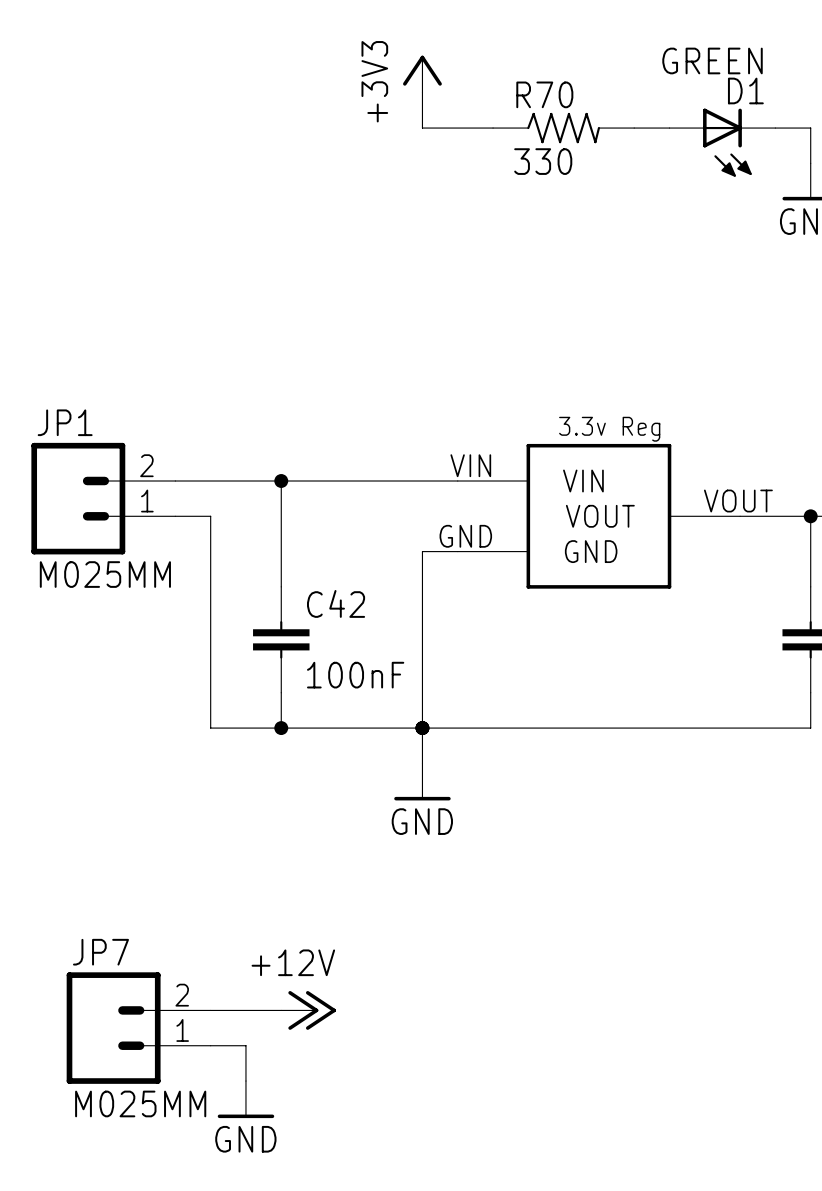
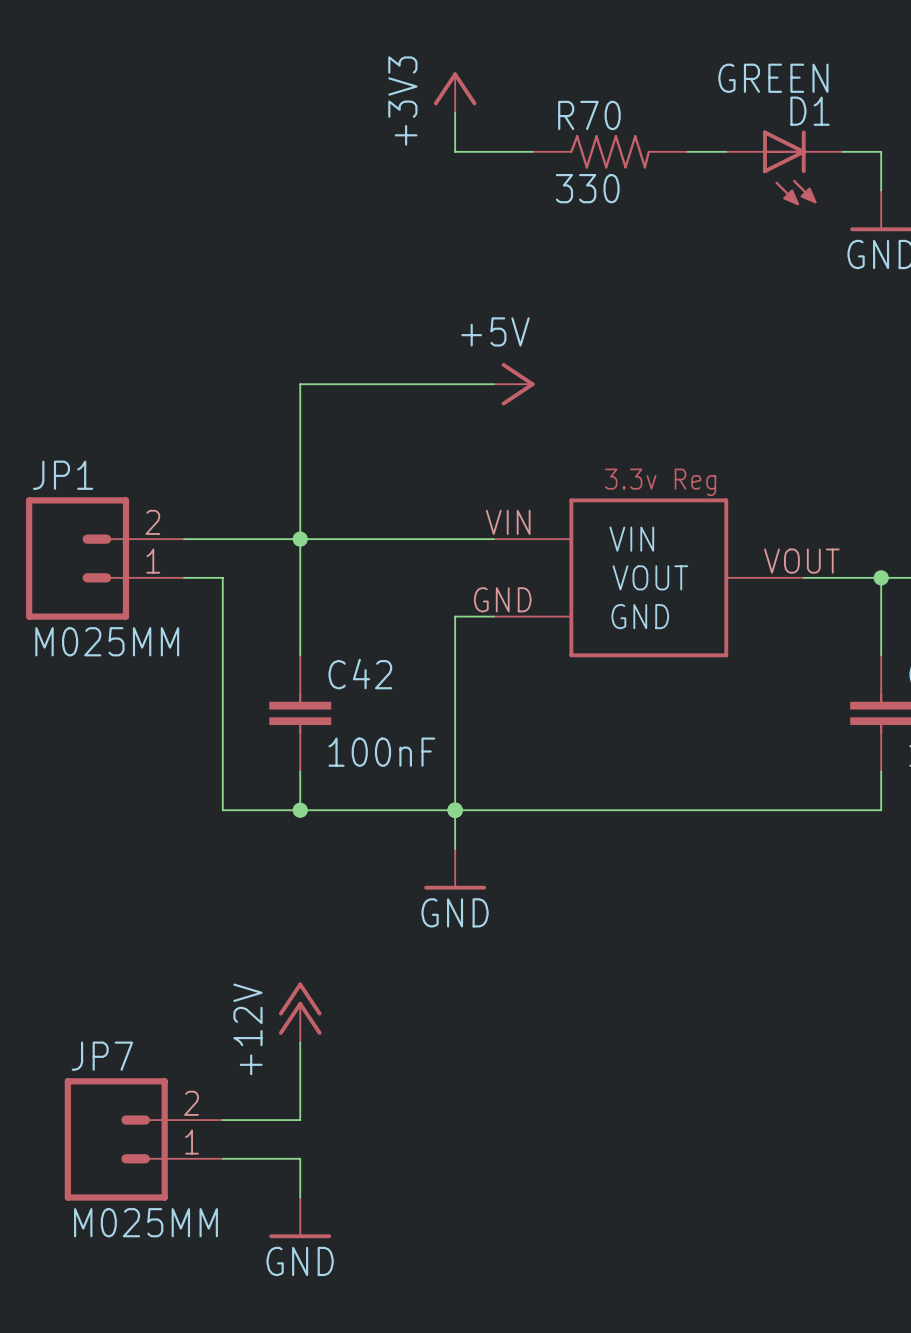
wire: none -> (493, 384) (300, 384) (300, 539)
power symbol: none -> +5V (514, 384)
wire: none -> (300, 1042) (300, 1120)
power symbol position: +12V (308, 1010) -> +12V (300, 1012)
power symbol rotation: 0° (312, 1010) -> 90° counterclockwise (300, 1008)
wire: (245, 1045) (245, 1081) -> (261, 1158) (300, 1158) (300, 1197)
power symbol position: GND (245, 1099) -> GND (300, 1217)

